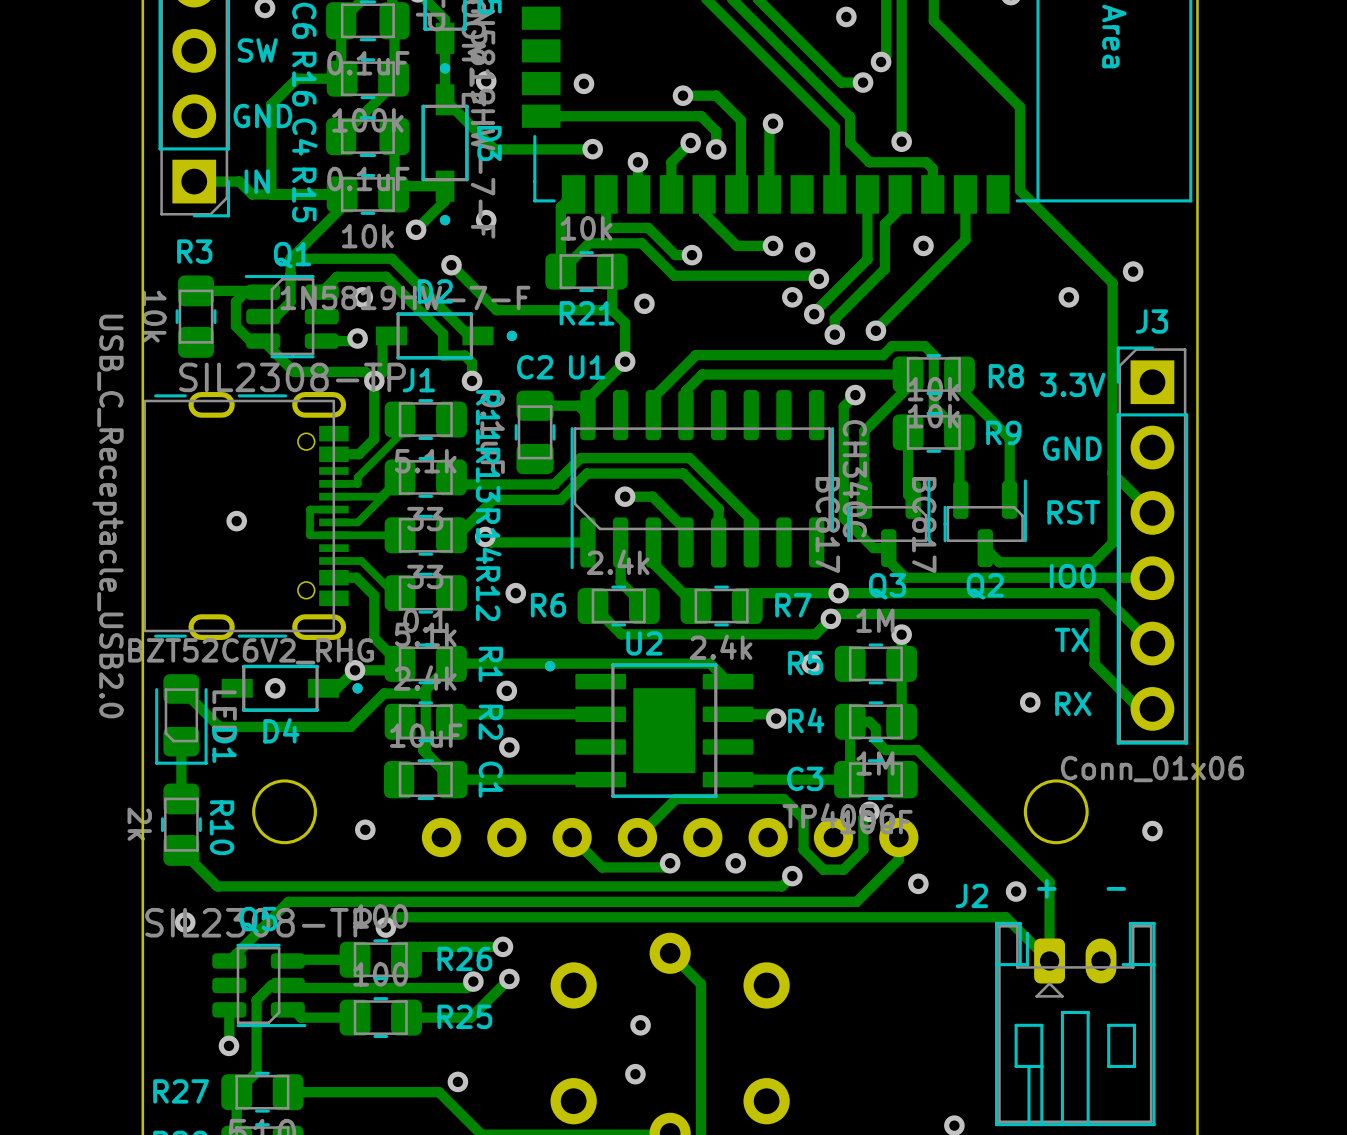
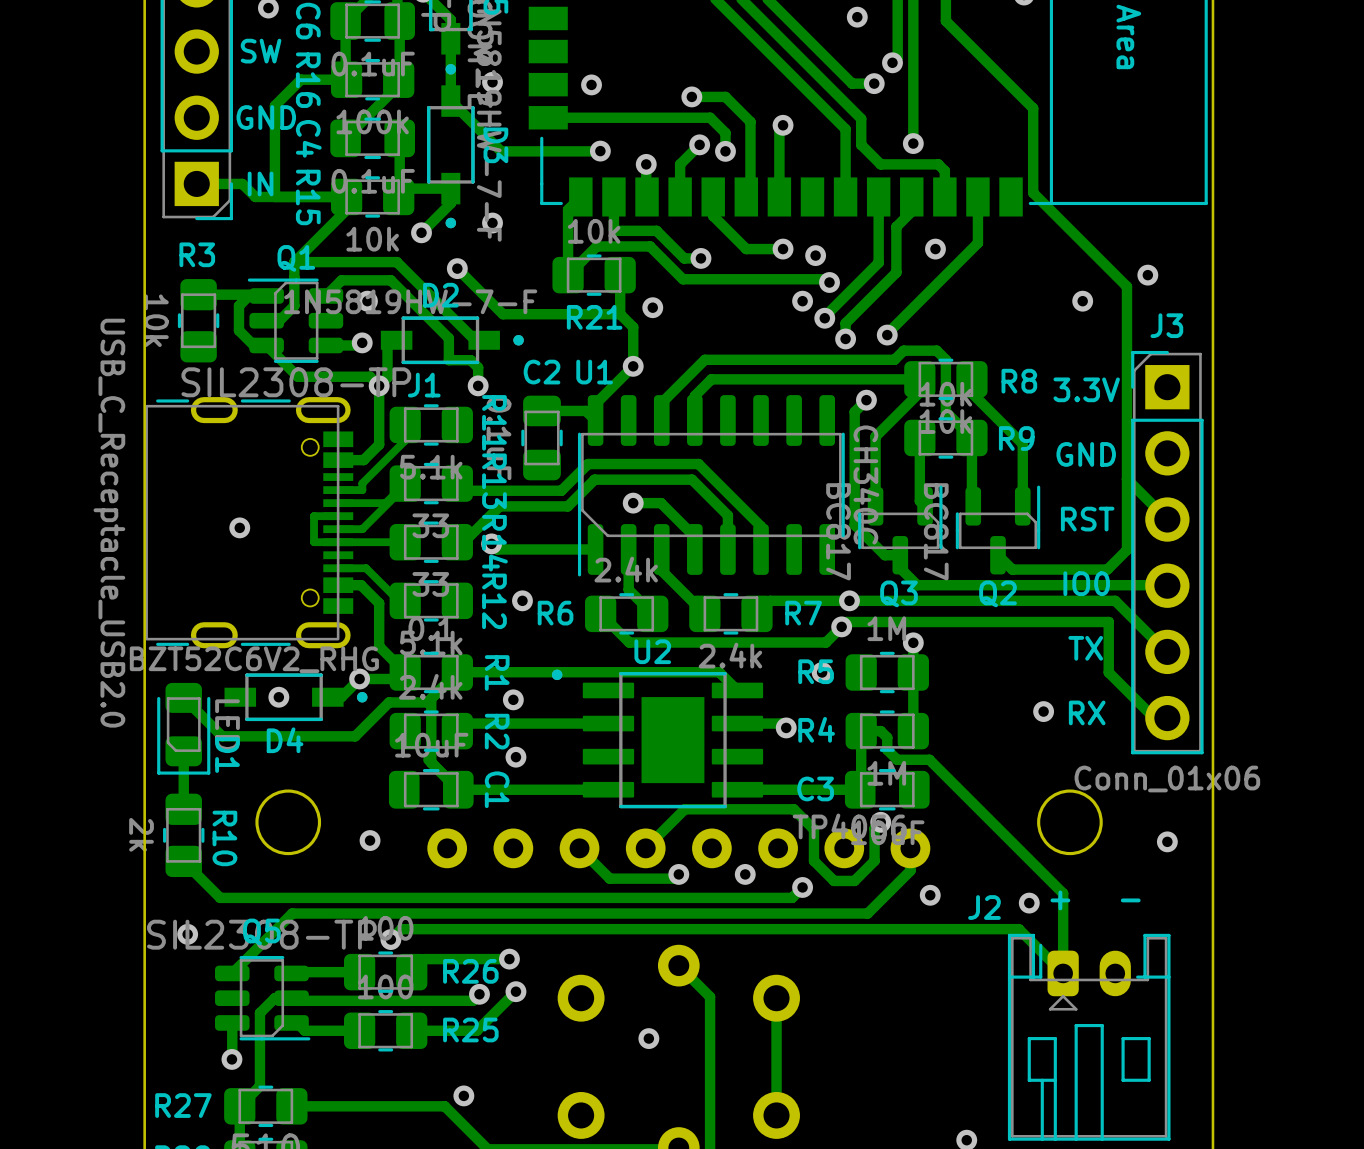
track: none -> (776, 998) (776, 1115)
via: (635, 1074) -> none

